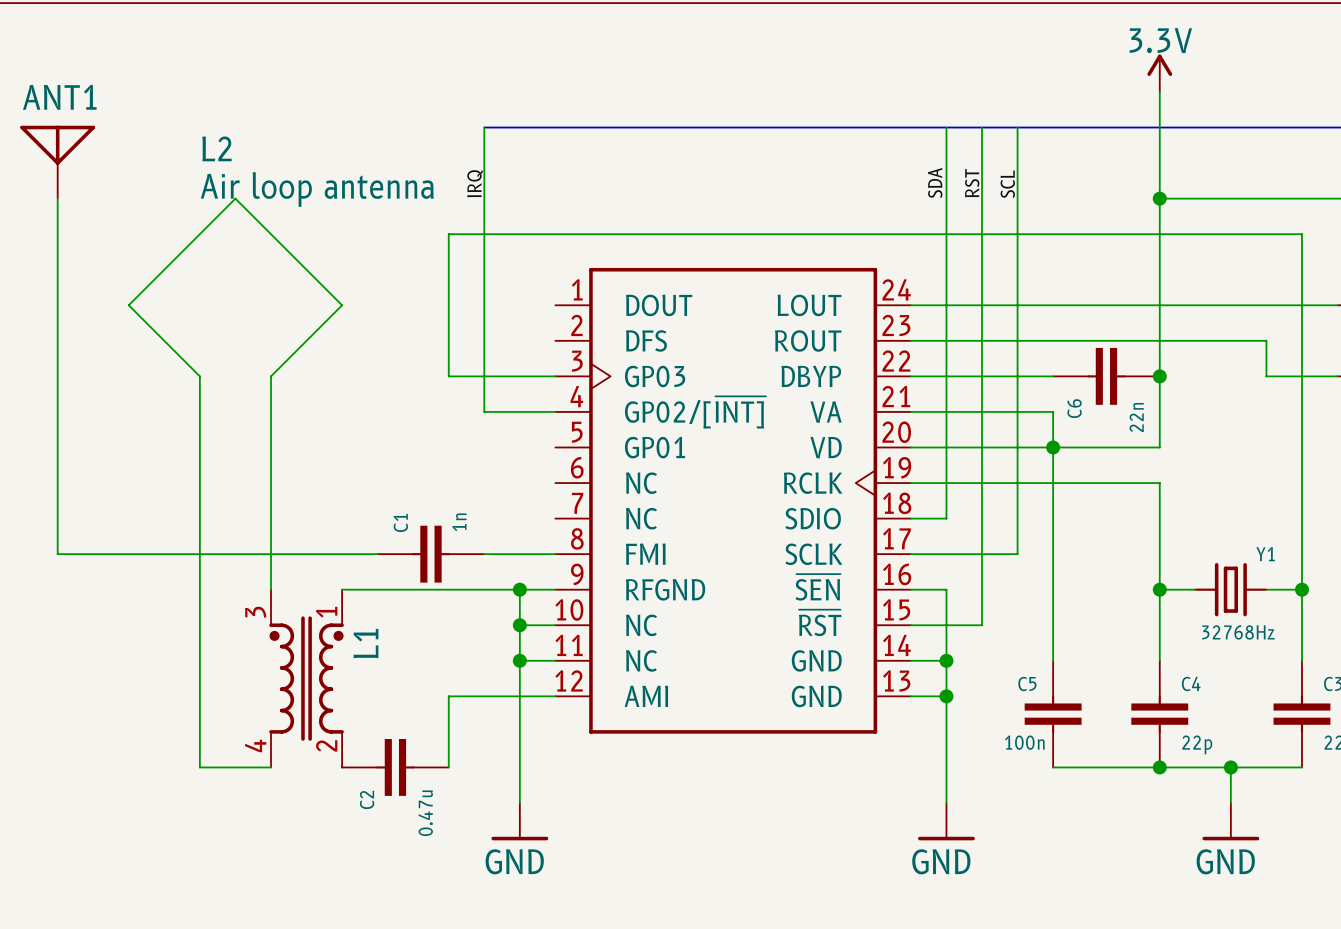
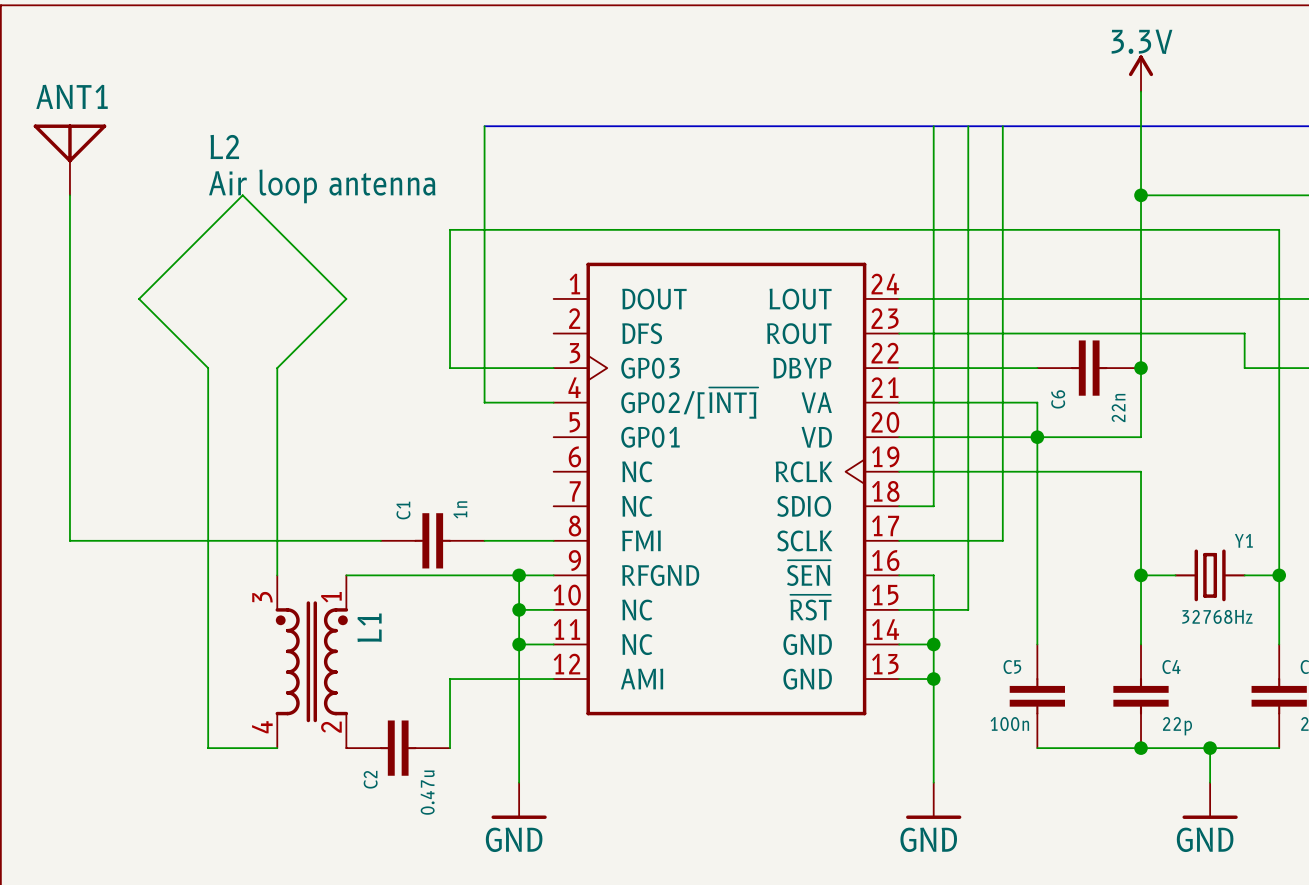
label: SDA (935, 182) -> none
label: IRQ (475, 183) -> none
label: RST (972, 183) -> none
label: SCL (1007, 184) -> none

